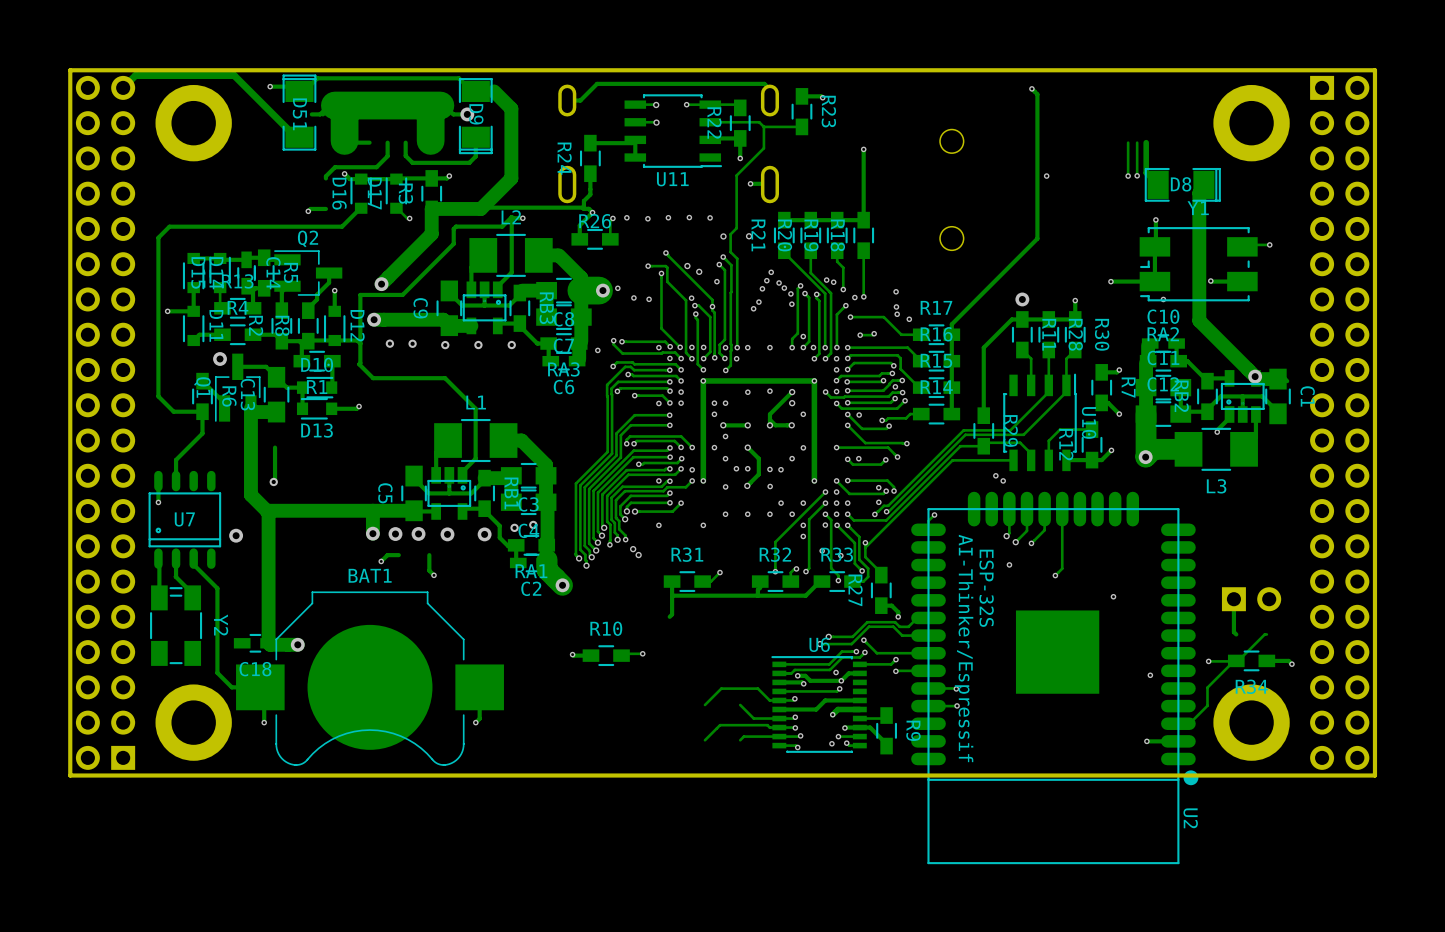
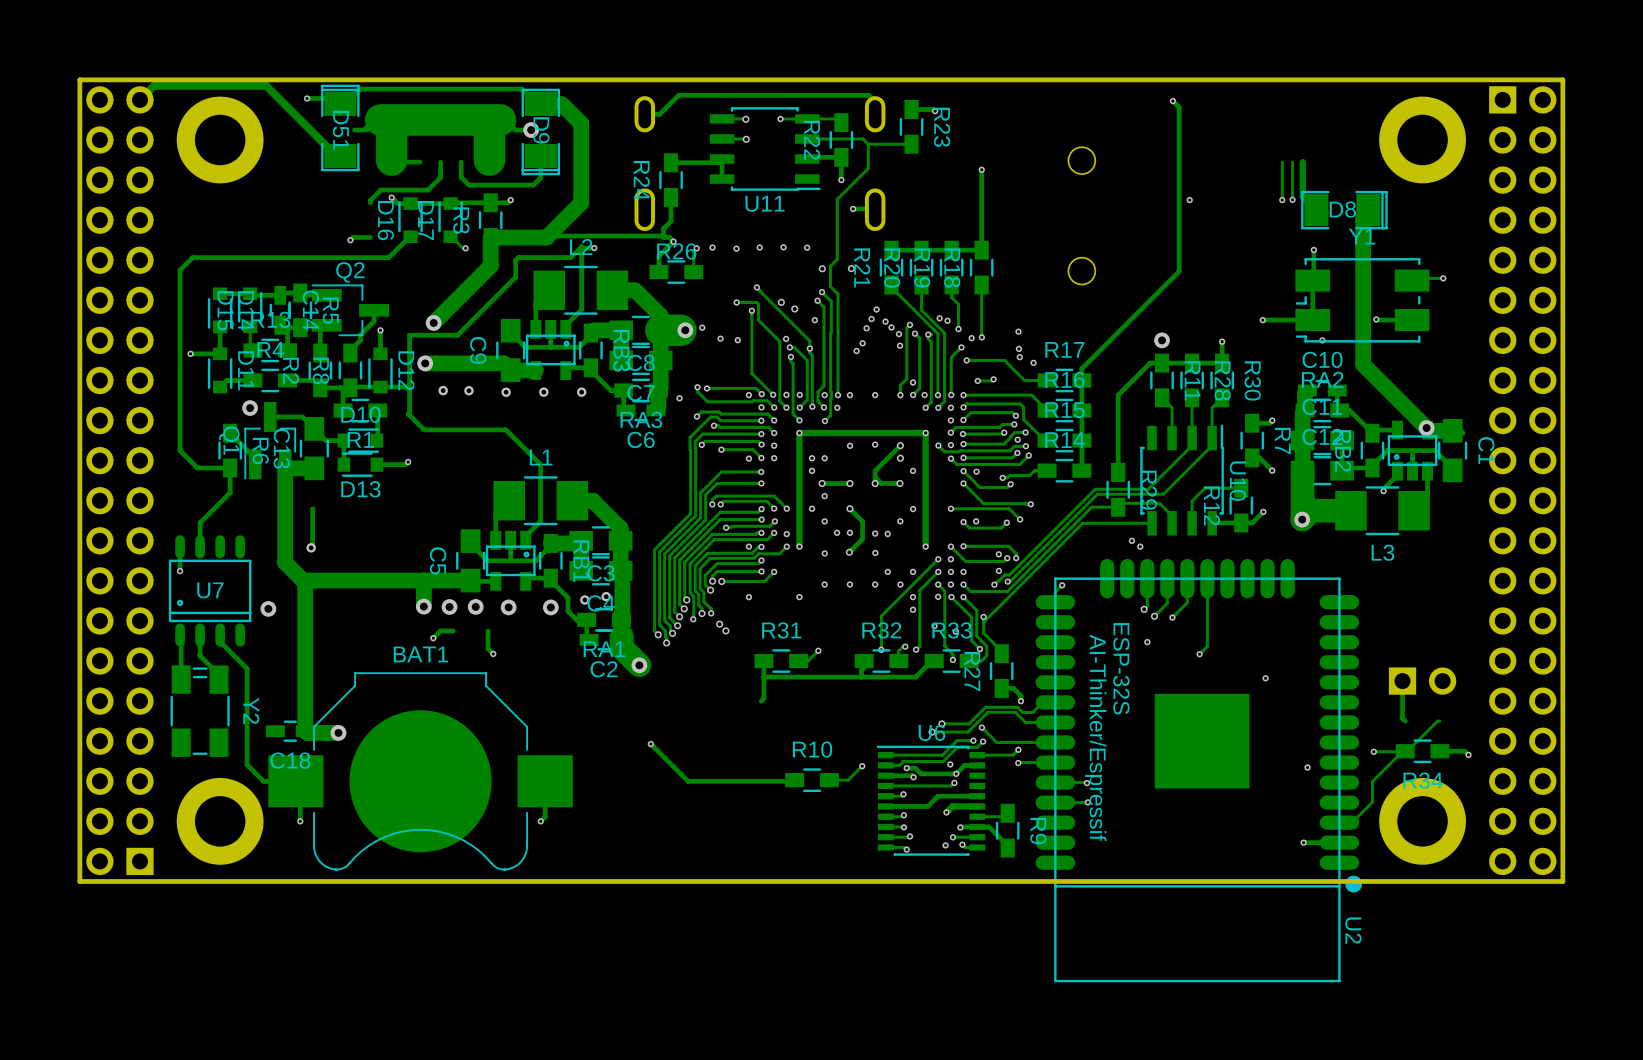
track: (642, 653) (623, 653) (621, 655) -> none
via: (642, 653) -> none
track: (590, 655) (573, 655) -> (793, 781) (688, 781) (651, 745)
R10 position: (606, 655) -> (812, 780)
track: none -> (862, 766) (848, 780) (829, 780)
via: none -> (862, 766)
track: (779, 700) (769, 700) (757, 688) (721, 688) (704, 704) -> none
track: (740, 704) (753, 718) (779, 718) -> none
track: (779, 727) (769, 727) (767, 725) (720, 725) (704, 740) -> none
track: (779, 736) (743, 736) (740, 740) -> none

